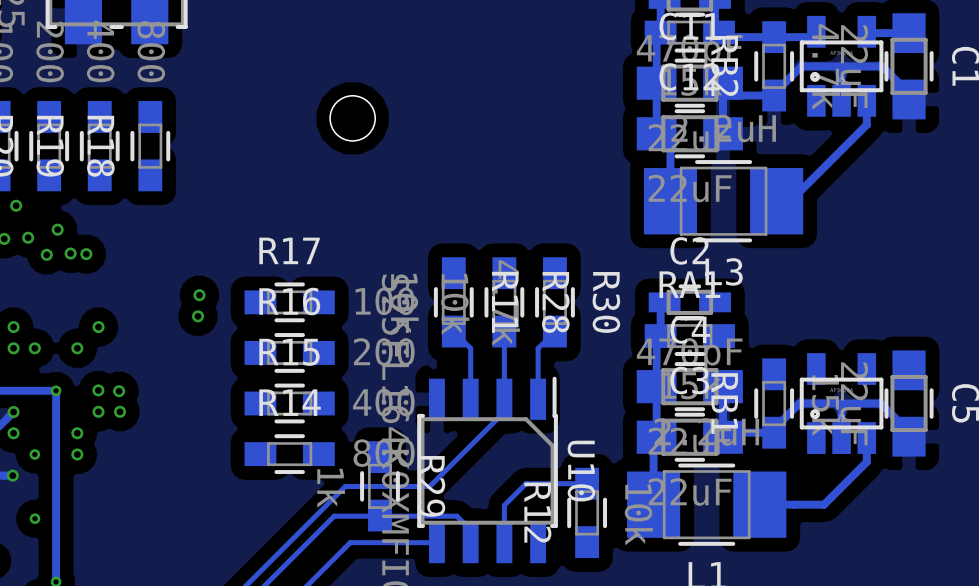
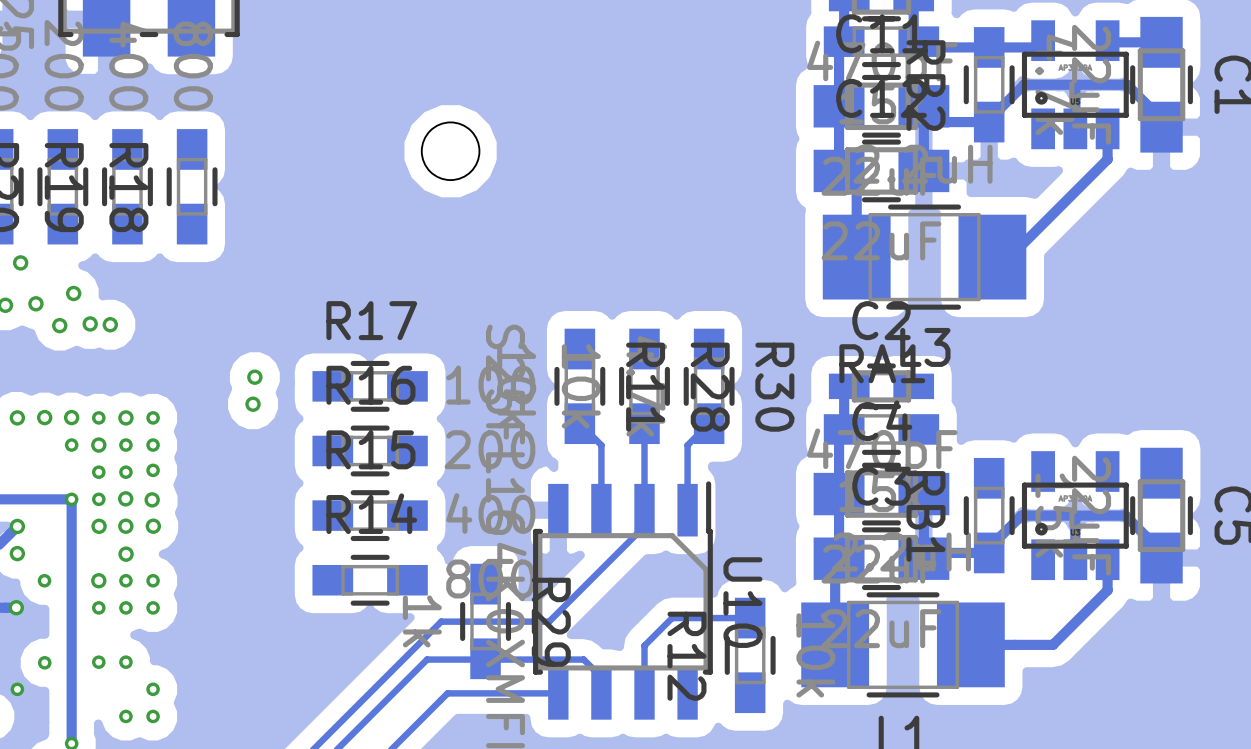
via: none -> (44, 417)
via: none -> (71, 417)
via: none -> (98, 417)
via: none -> (153, 417)
via: (13, 348) -> none
via: (34, 348) -> none
via: none -> (71, 445)
via: none -> (125, 445)
via: none -> (153, 445)
via: none -> (153, 470)
via: none -> (98, 472)
via: none -> (125, 472)
via: none -> (98, 499)
via: none -> (99, 526)
via: (77, 433) -> none
via: none -> (126, 554)
via: none -> (125, 580)
via: none -> (153, 580)
via: none -> (98, 607)
via: none -> (125, 607)
via: none -> (153, 607)
via: none -> (98, 662)
via: none -> (125, 662)
via: none -> (17, 689)
via: none -> (153, 689)
via: none -> (125, 716)
via: none -> (153, 716)

